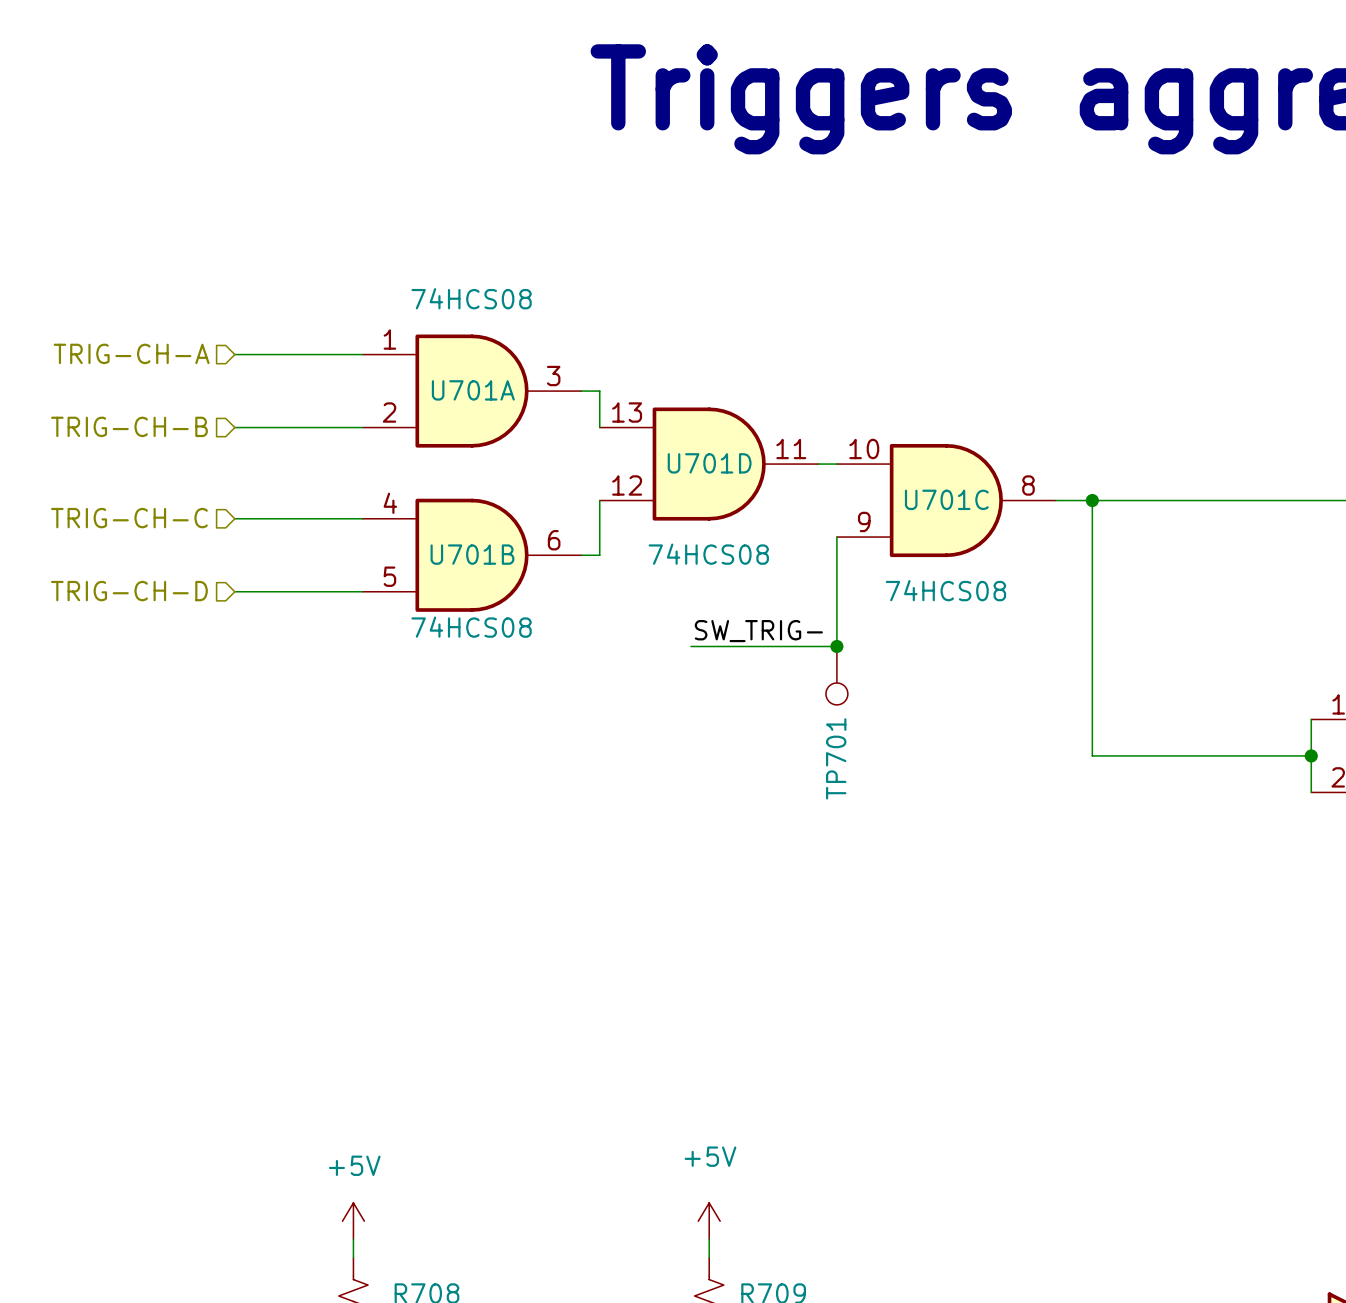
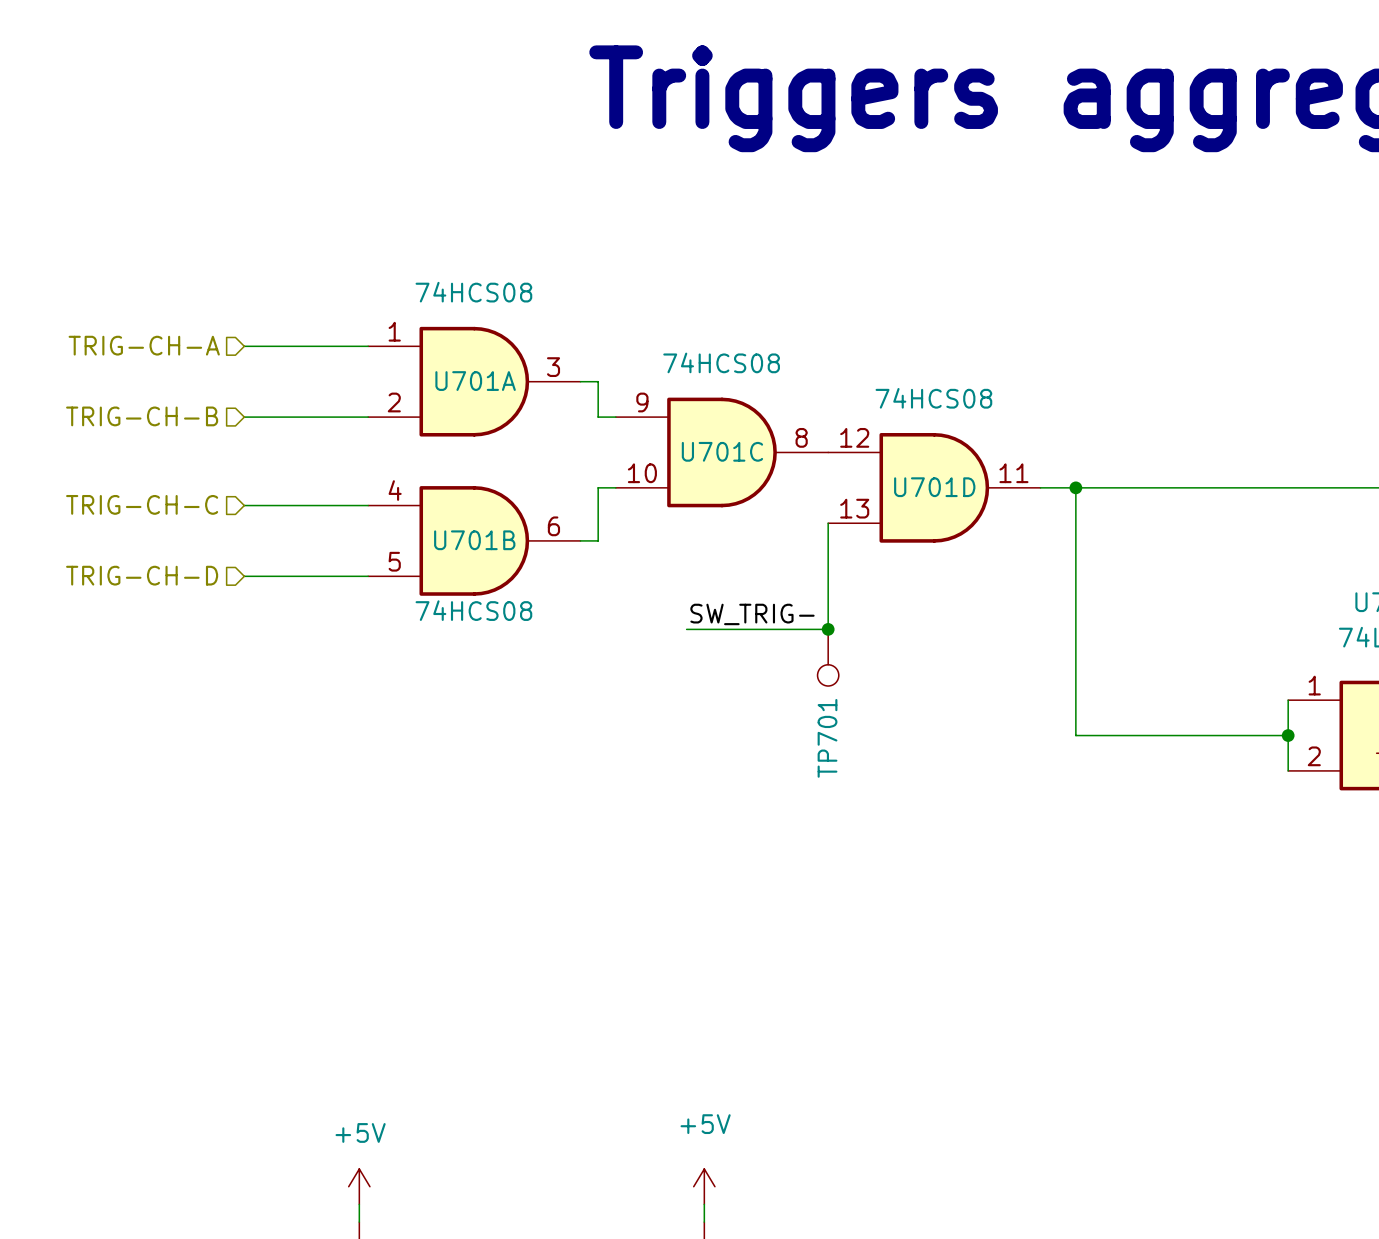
U701D flip: as is (709, 464) -> up-down (934, 487)
U701D position: (709, 464) -> (934, 487)
U701C flip: as is (946, 500) -> up-down (722, 452)
U701C position: (946, 500) -> (722, 452)

